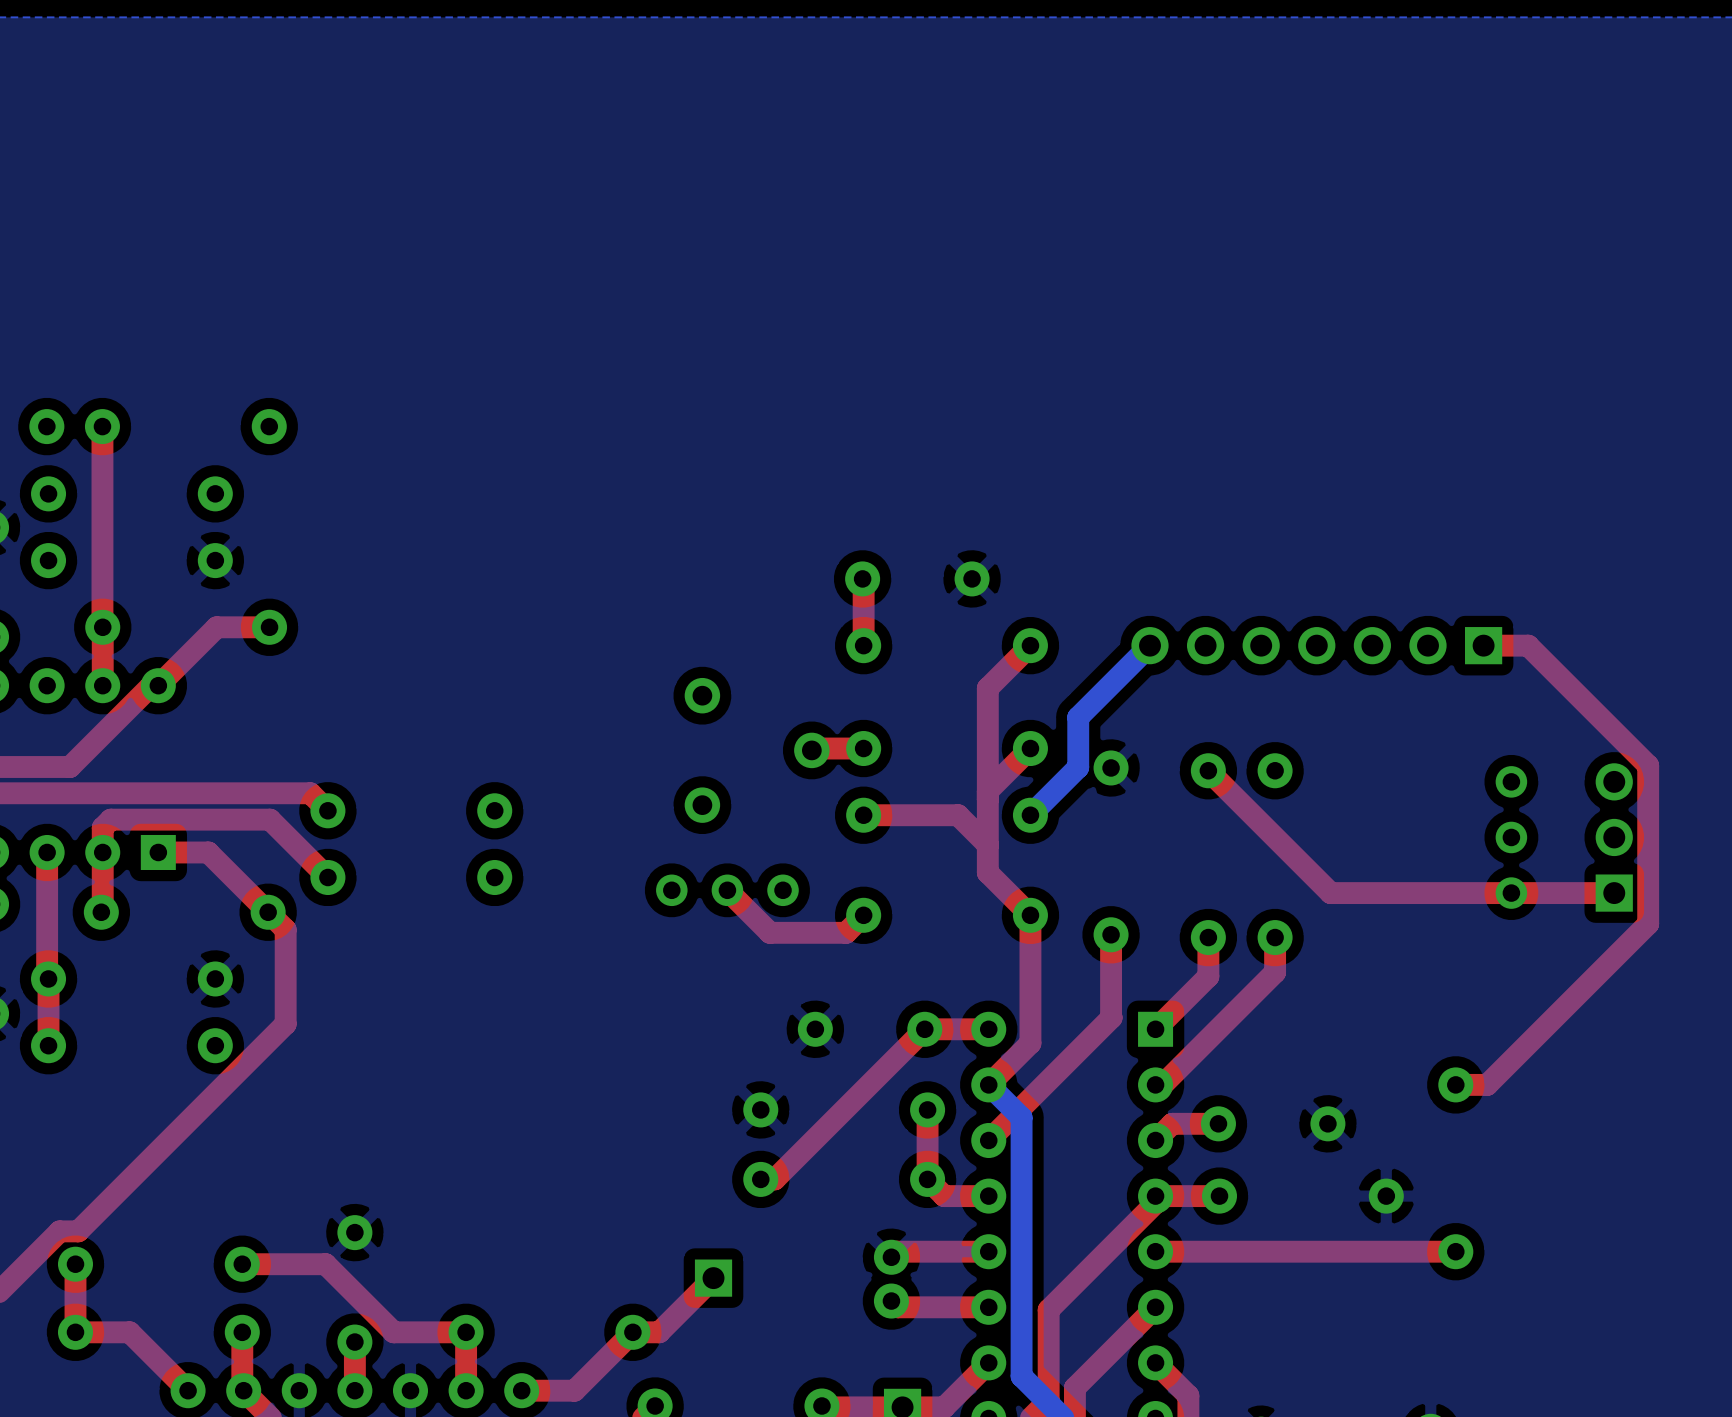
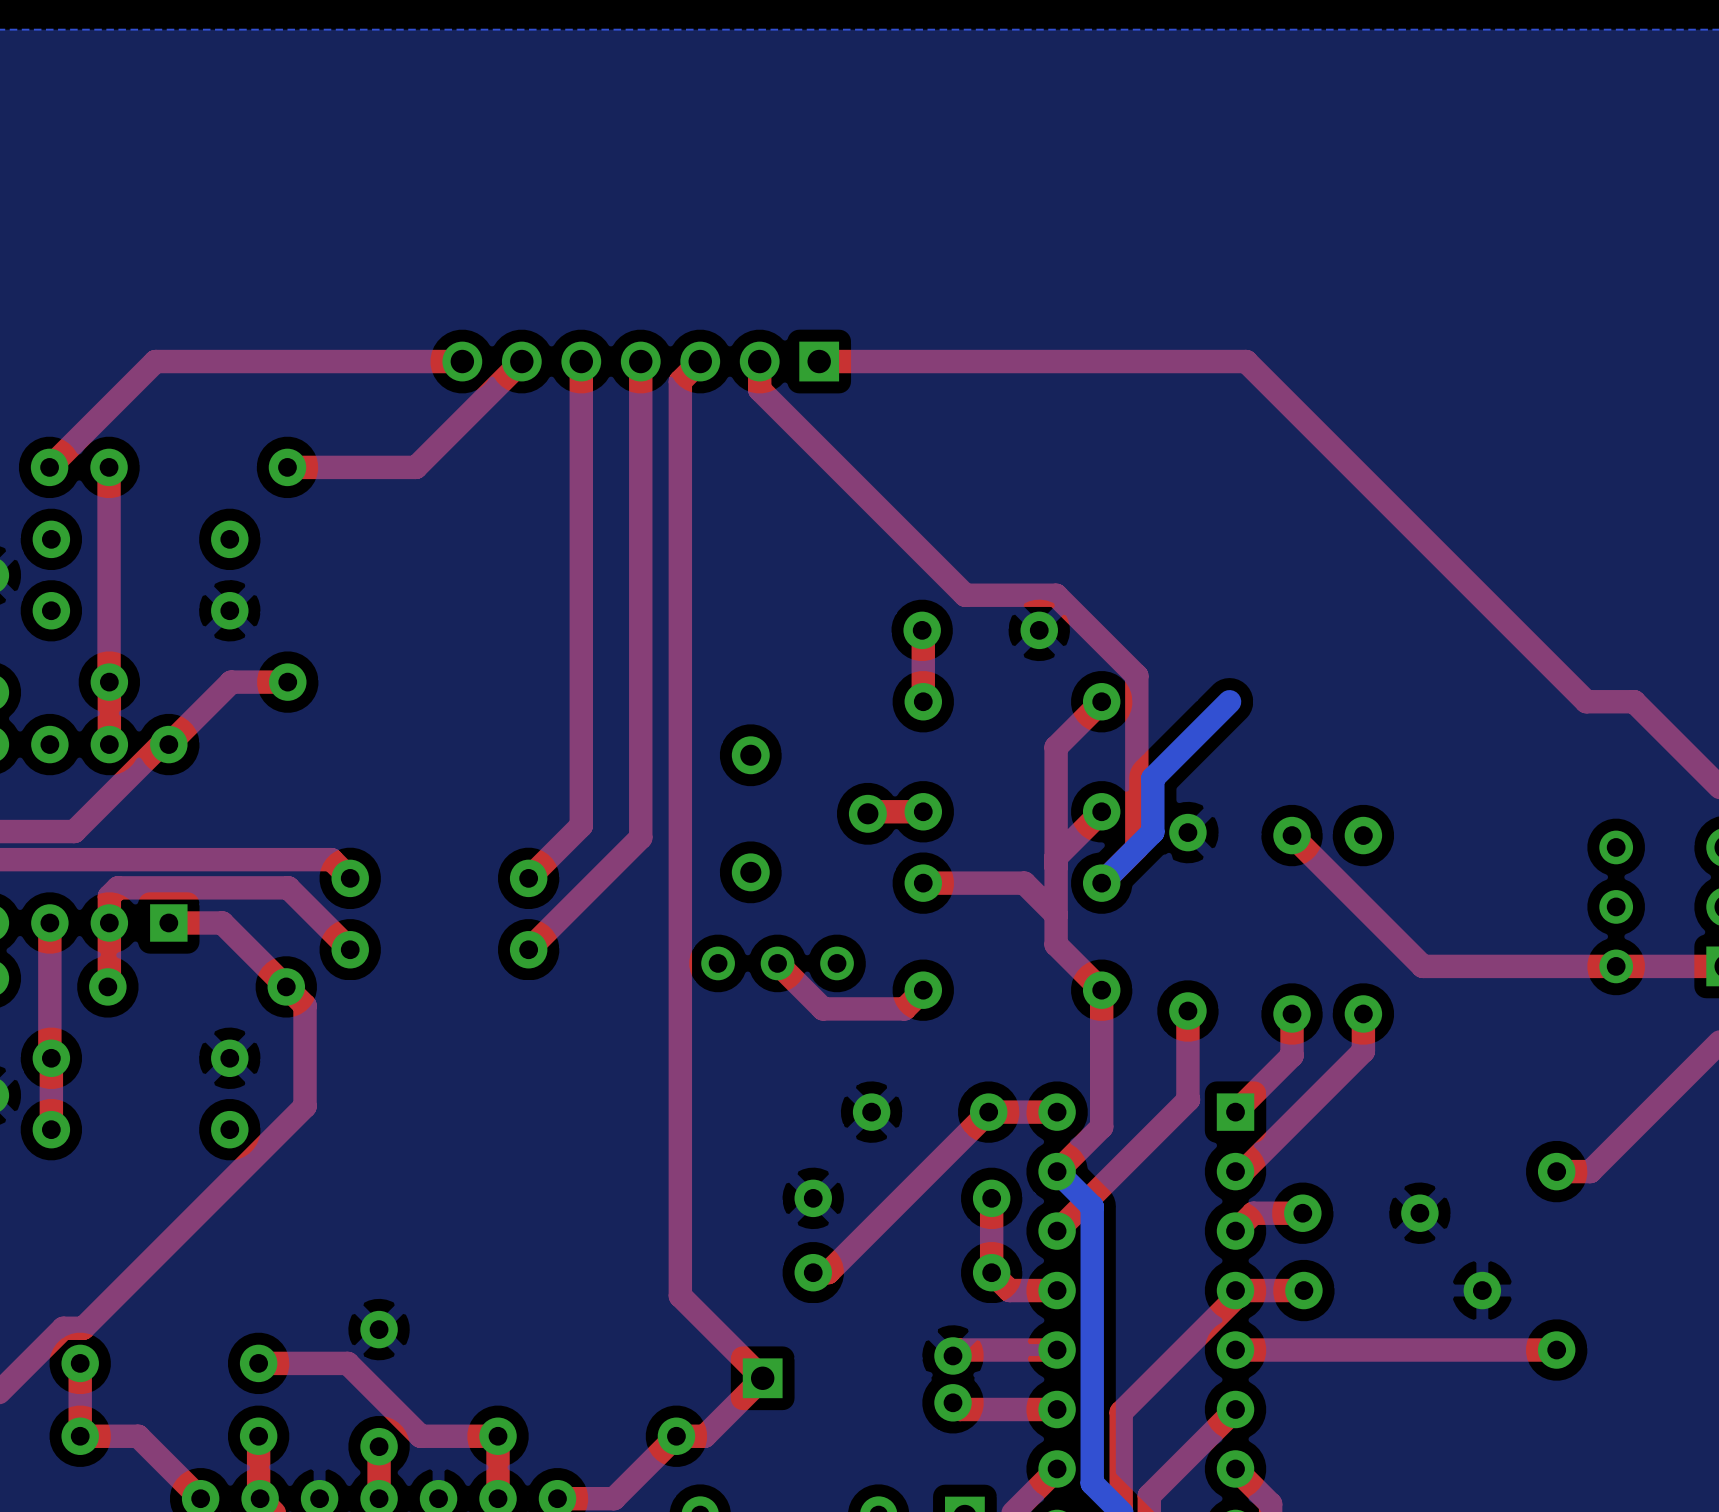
top track: none -> (462, 361) (155, 361) (49, 467)
top track: none -> (521, 361) (415, 467) (287, 467)
top track: none -> (581, 361) (581, 825) (528, 878)
top track: none -> (640, 361) (640, 837) (528, 949)
part: none -> (640, 361)
top track: none -> (700, 361) (680, 381) (680, 1295) (762, 1378)
top track: none -> (759, 361) (759, 389) (965, 595) (1056, 595) (1136, 675) (1136, 848) (1101, 883)
top track: none -> (819, 361) (1246, 361) (1586, 701)
part: (1316, 645) -> none

